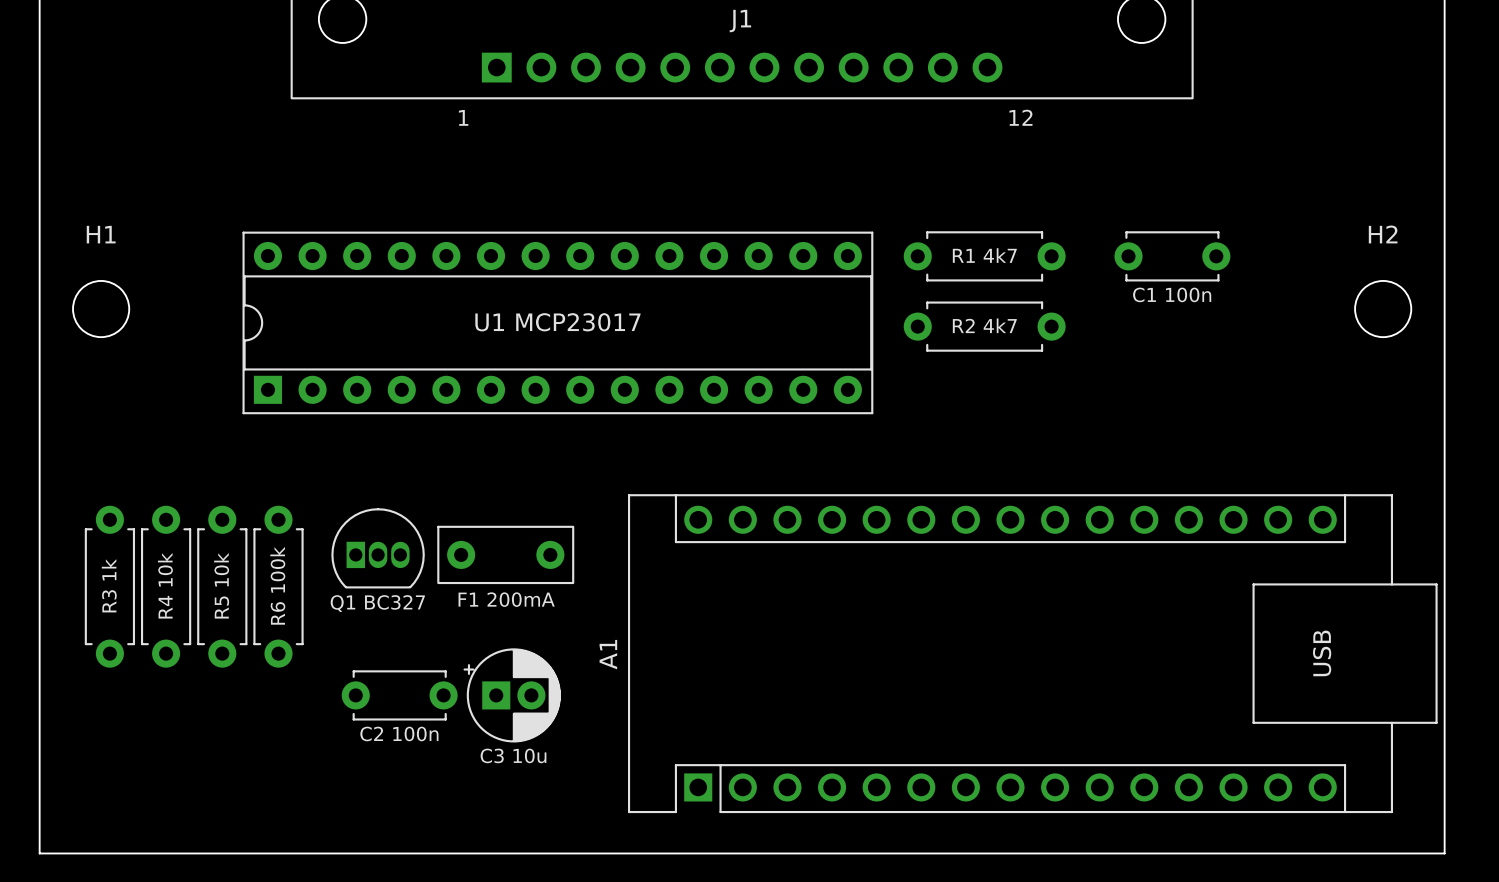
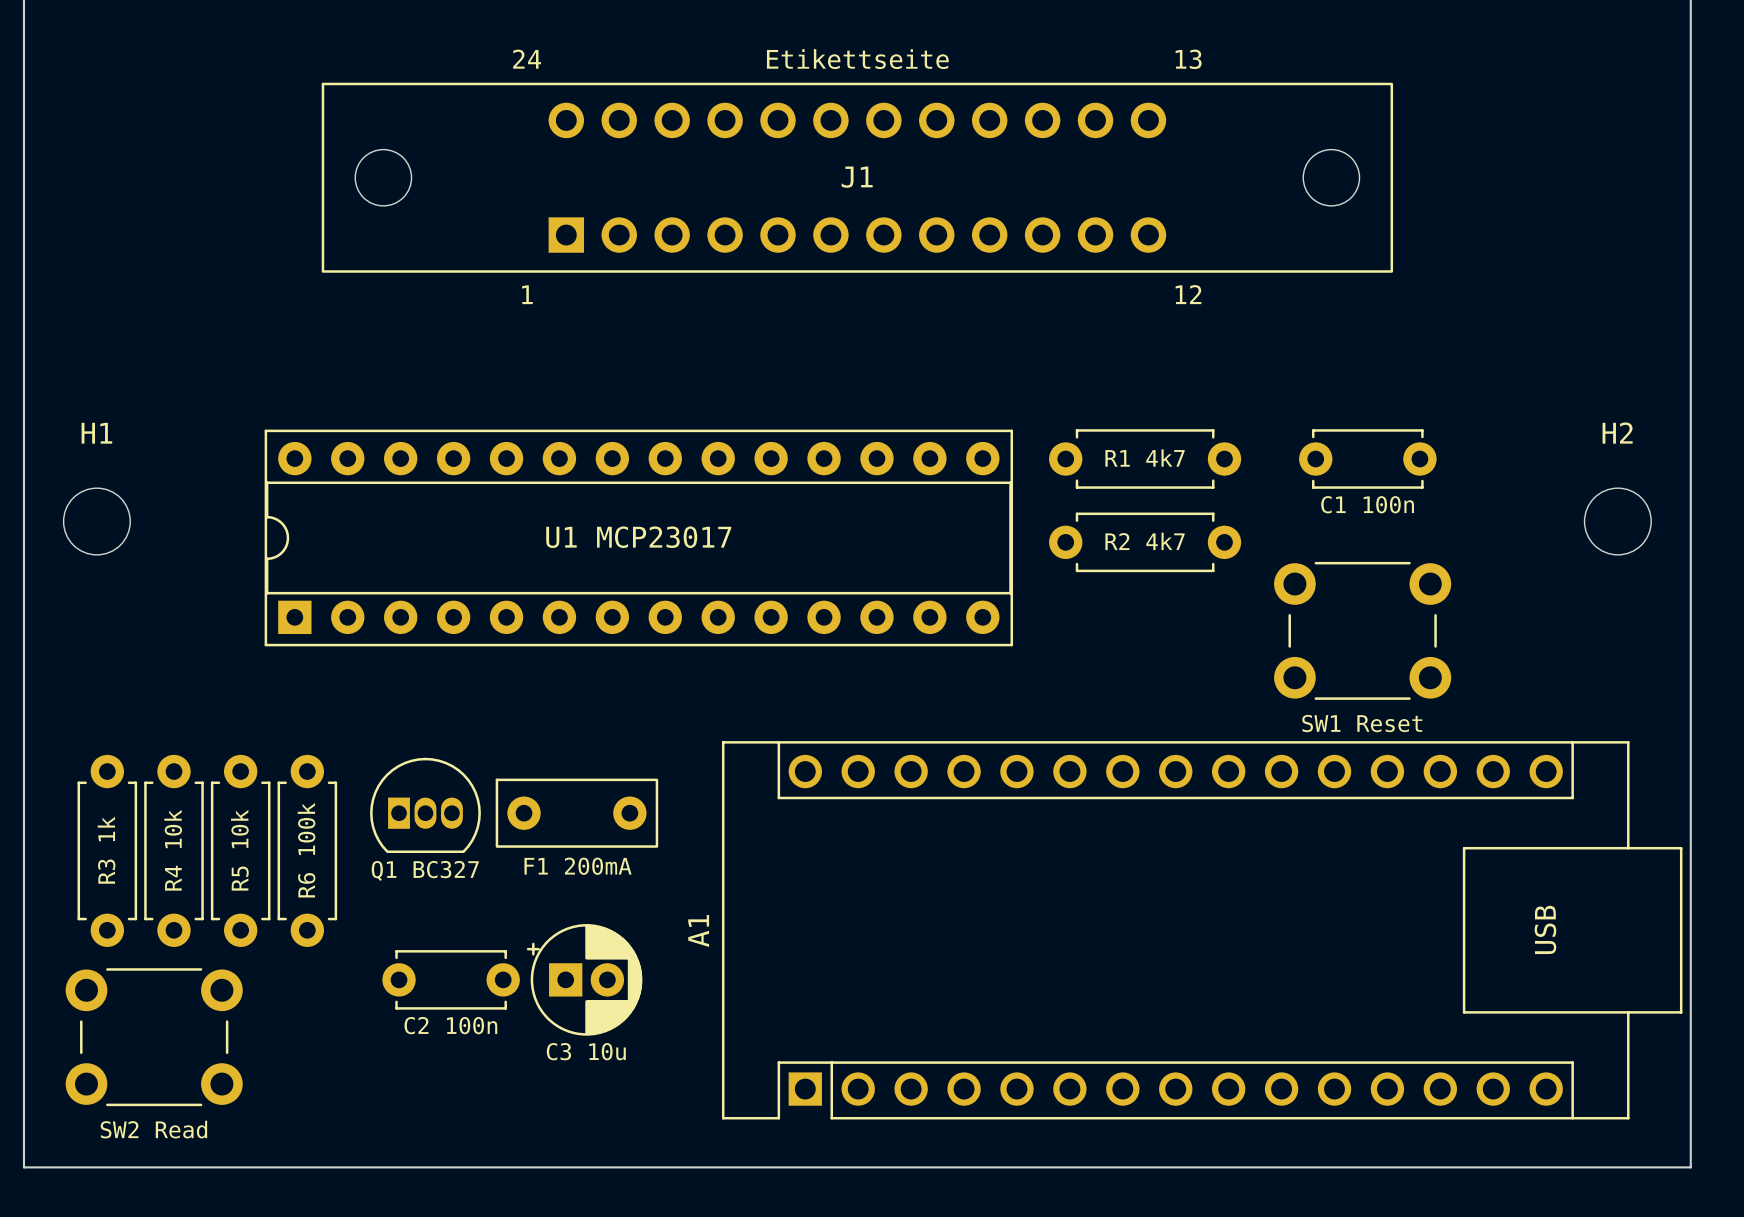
part: none -> (1362, 630)
text: none -> SW1 Reset (1362, 723)
part: none -> (154, 1037)
text: none -> SW2 Read (153, 1129)

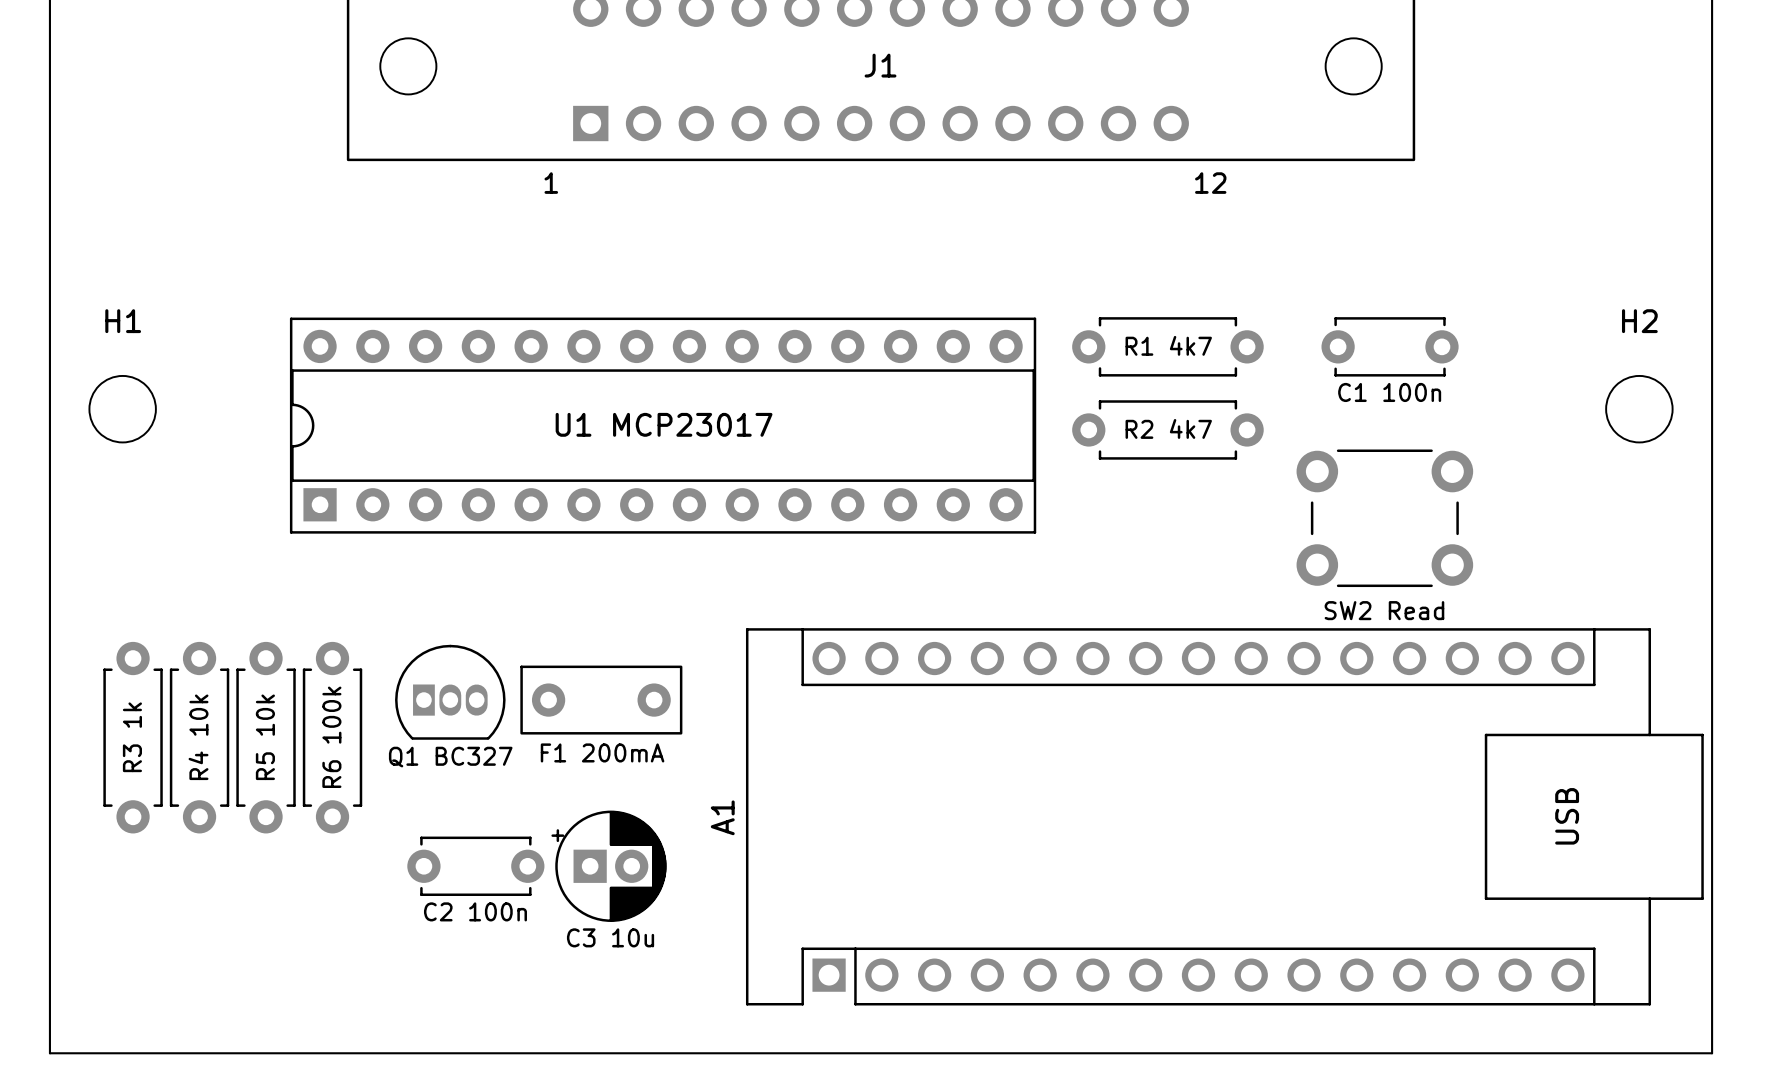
text: SW1 Reset (1362, 723) -> SW2 Read (1384, 610)
part: (154, 1037) -> none
text: SW2 Read (153, 1129) -> none

